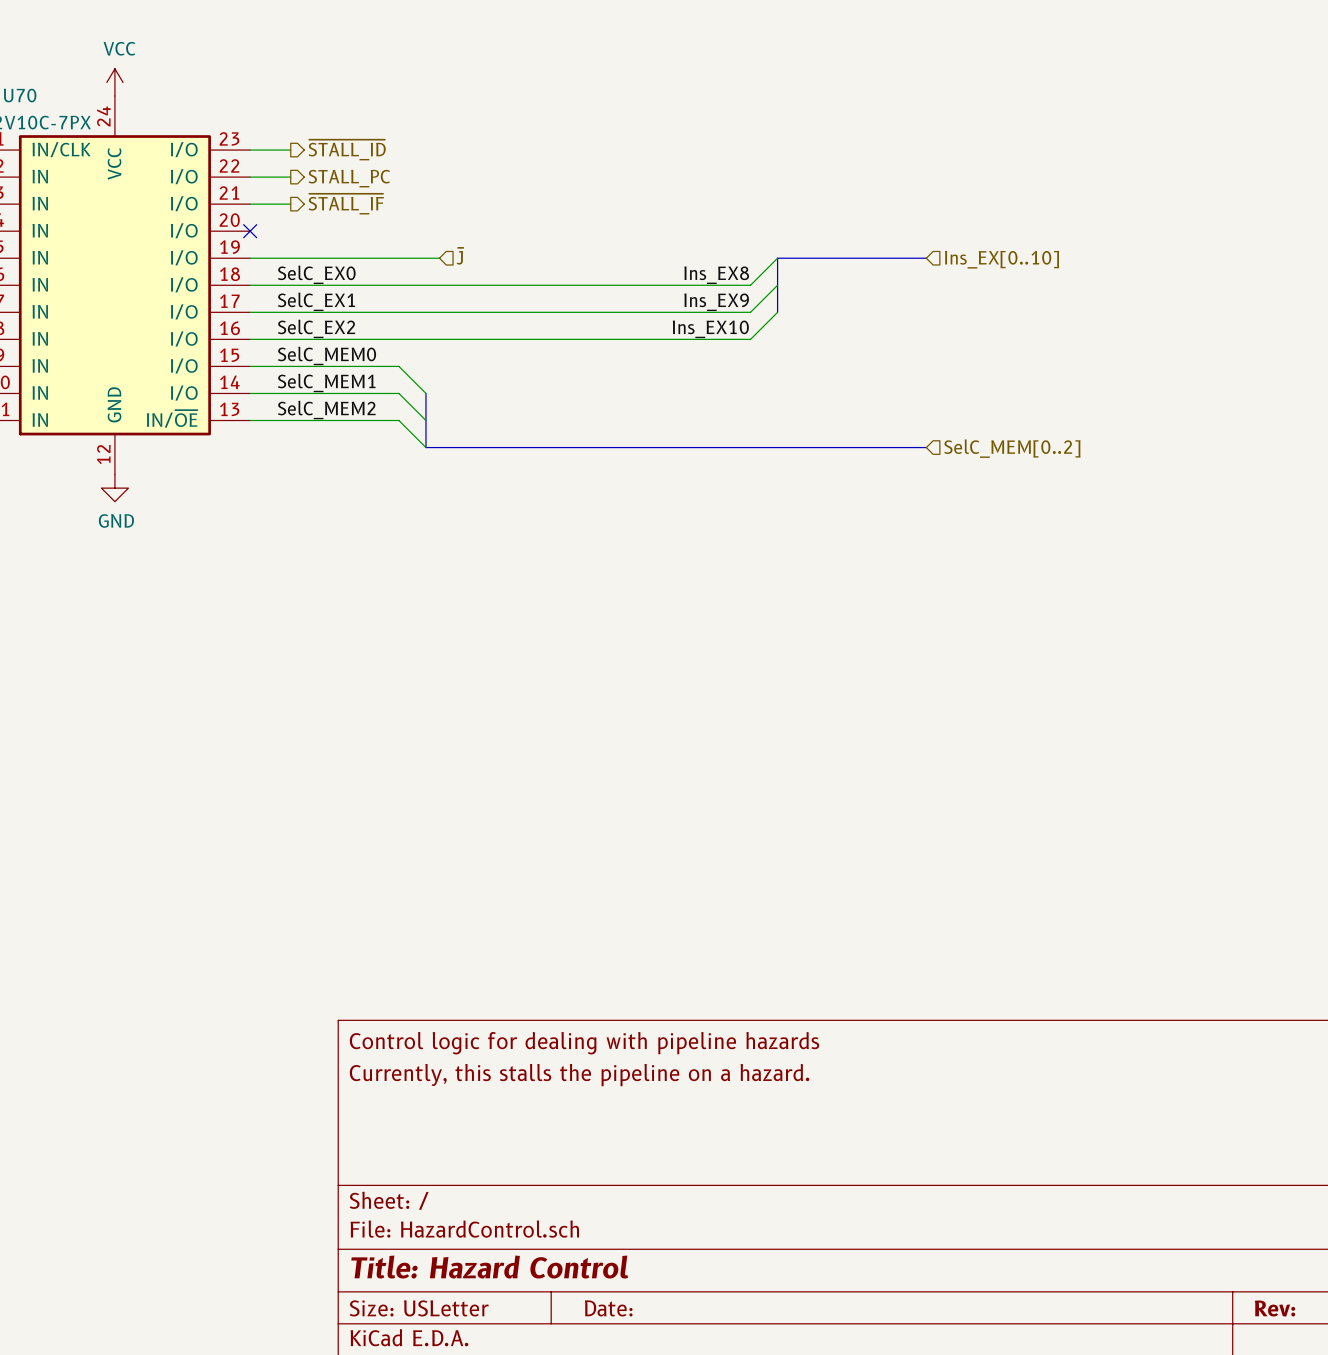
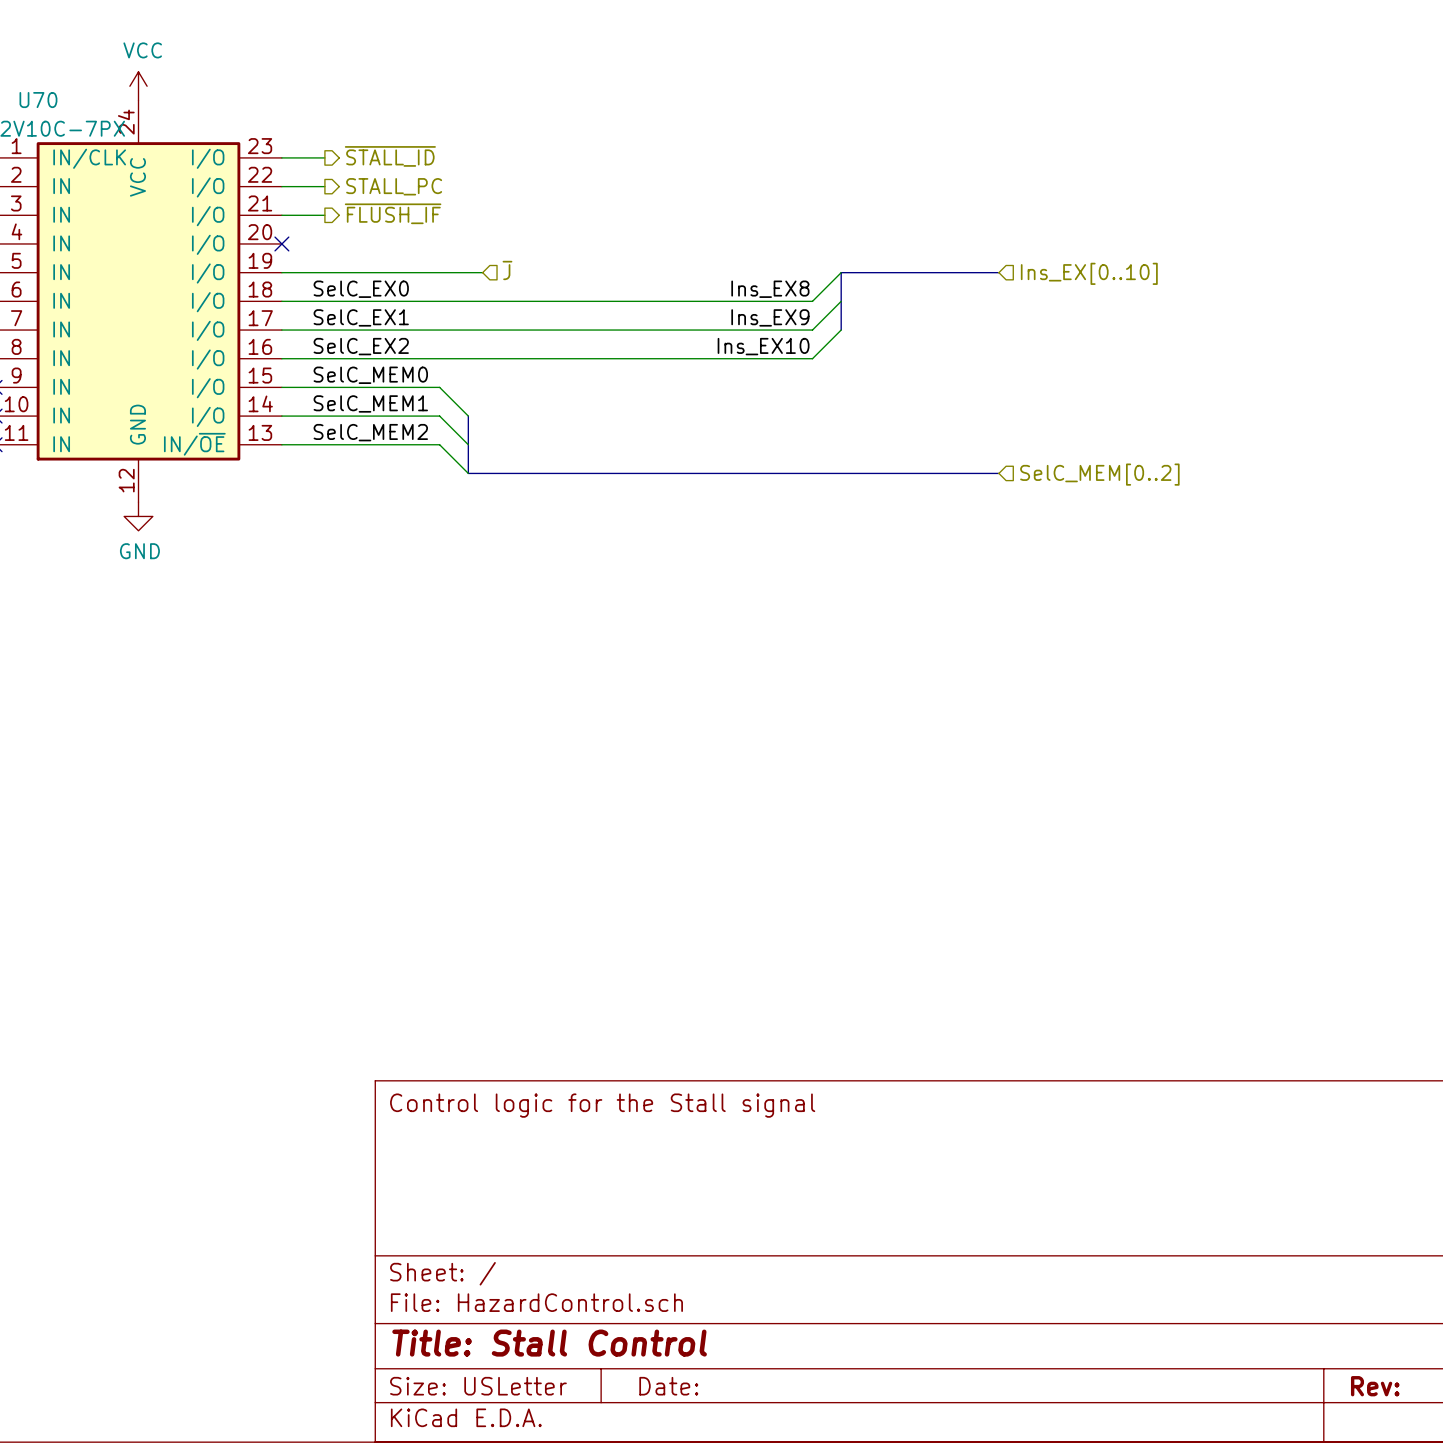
hierarchical label: ~{STALL_IF} (346, 204) -> ~{FLUSH_IF} (393, 213)
title block: Control logic for dealing with pipeline hazards (584, 1043) -> Control logic for the Stall signal (602, 1105)
title block: Currently, this stalls the pipeline on a hazard. (579, 1075) -> none
title block: Title: Hazard Control (489, 1267) -> Title: Stall Control (549, 1343)

